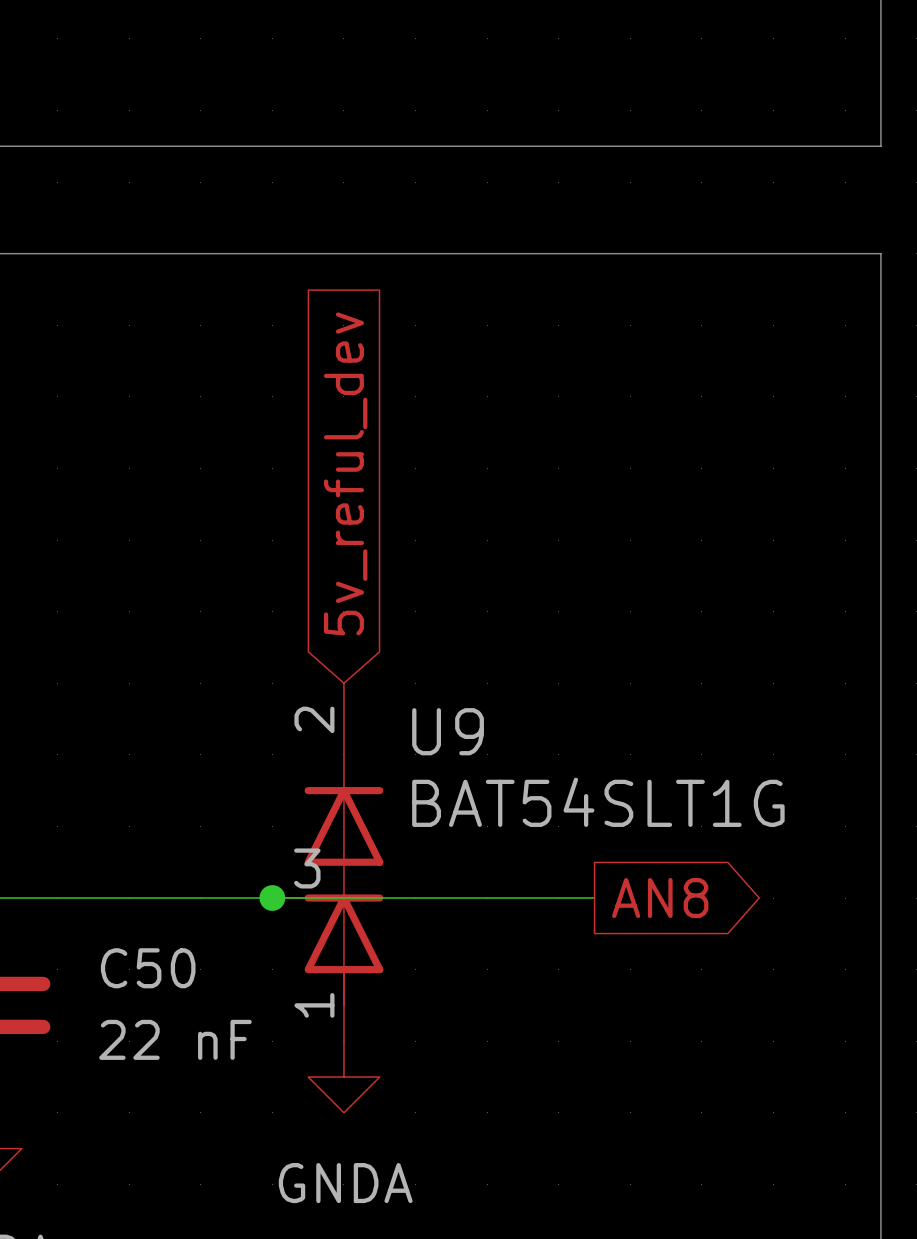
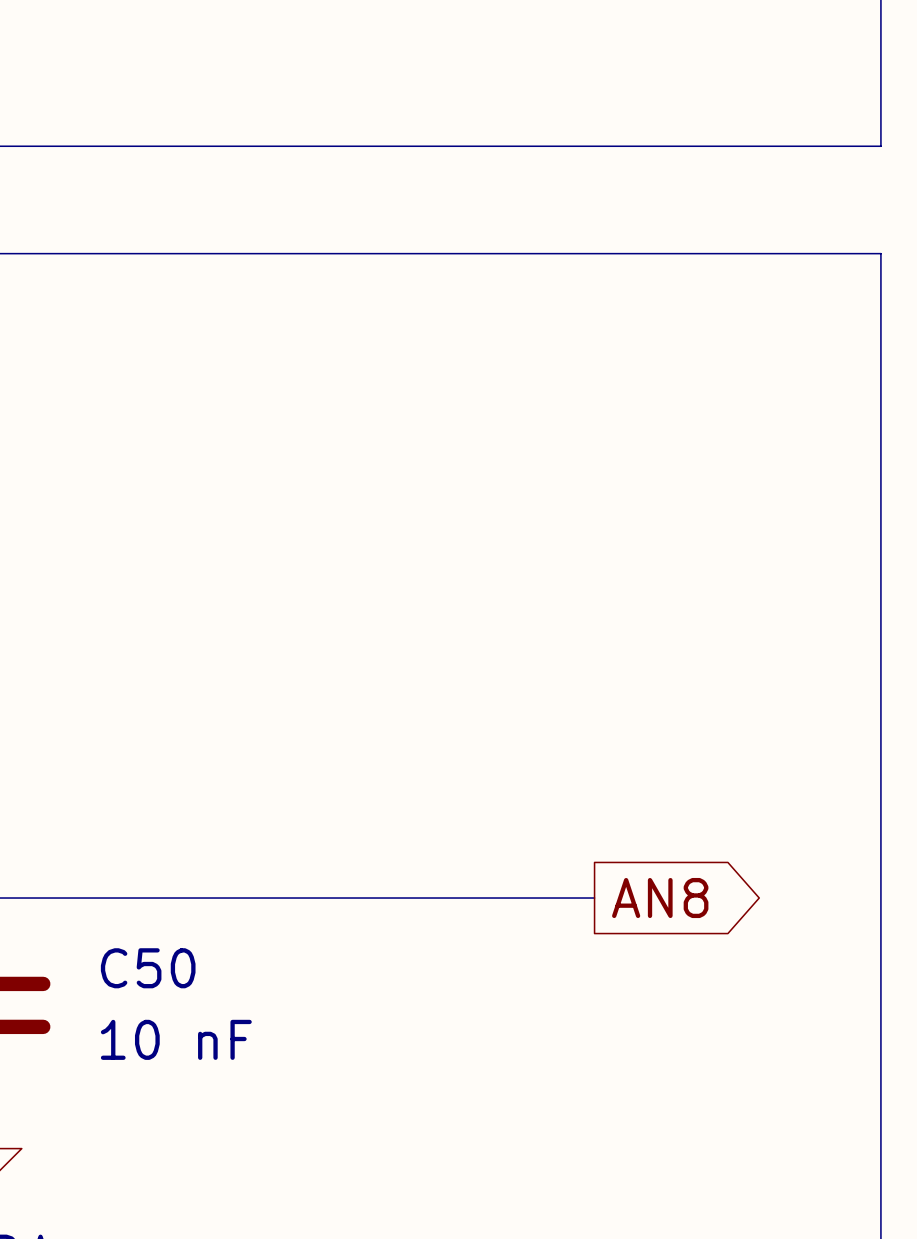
global label: 5v_reful_dev (345, 473) -> none
U9: BAT54SLT1G (327, 862) -> none
junction: (272, 898) -> none
C50 value: 22 nF (175, 1039) -> 10 nF (176, 1039)
power symbol: GNDA (343, 1077) -> none

